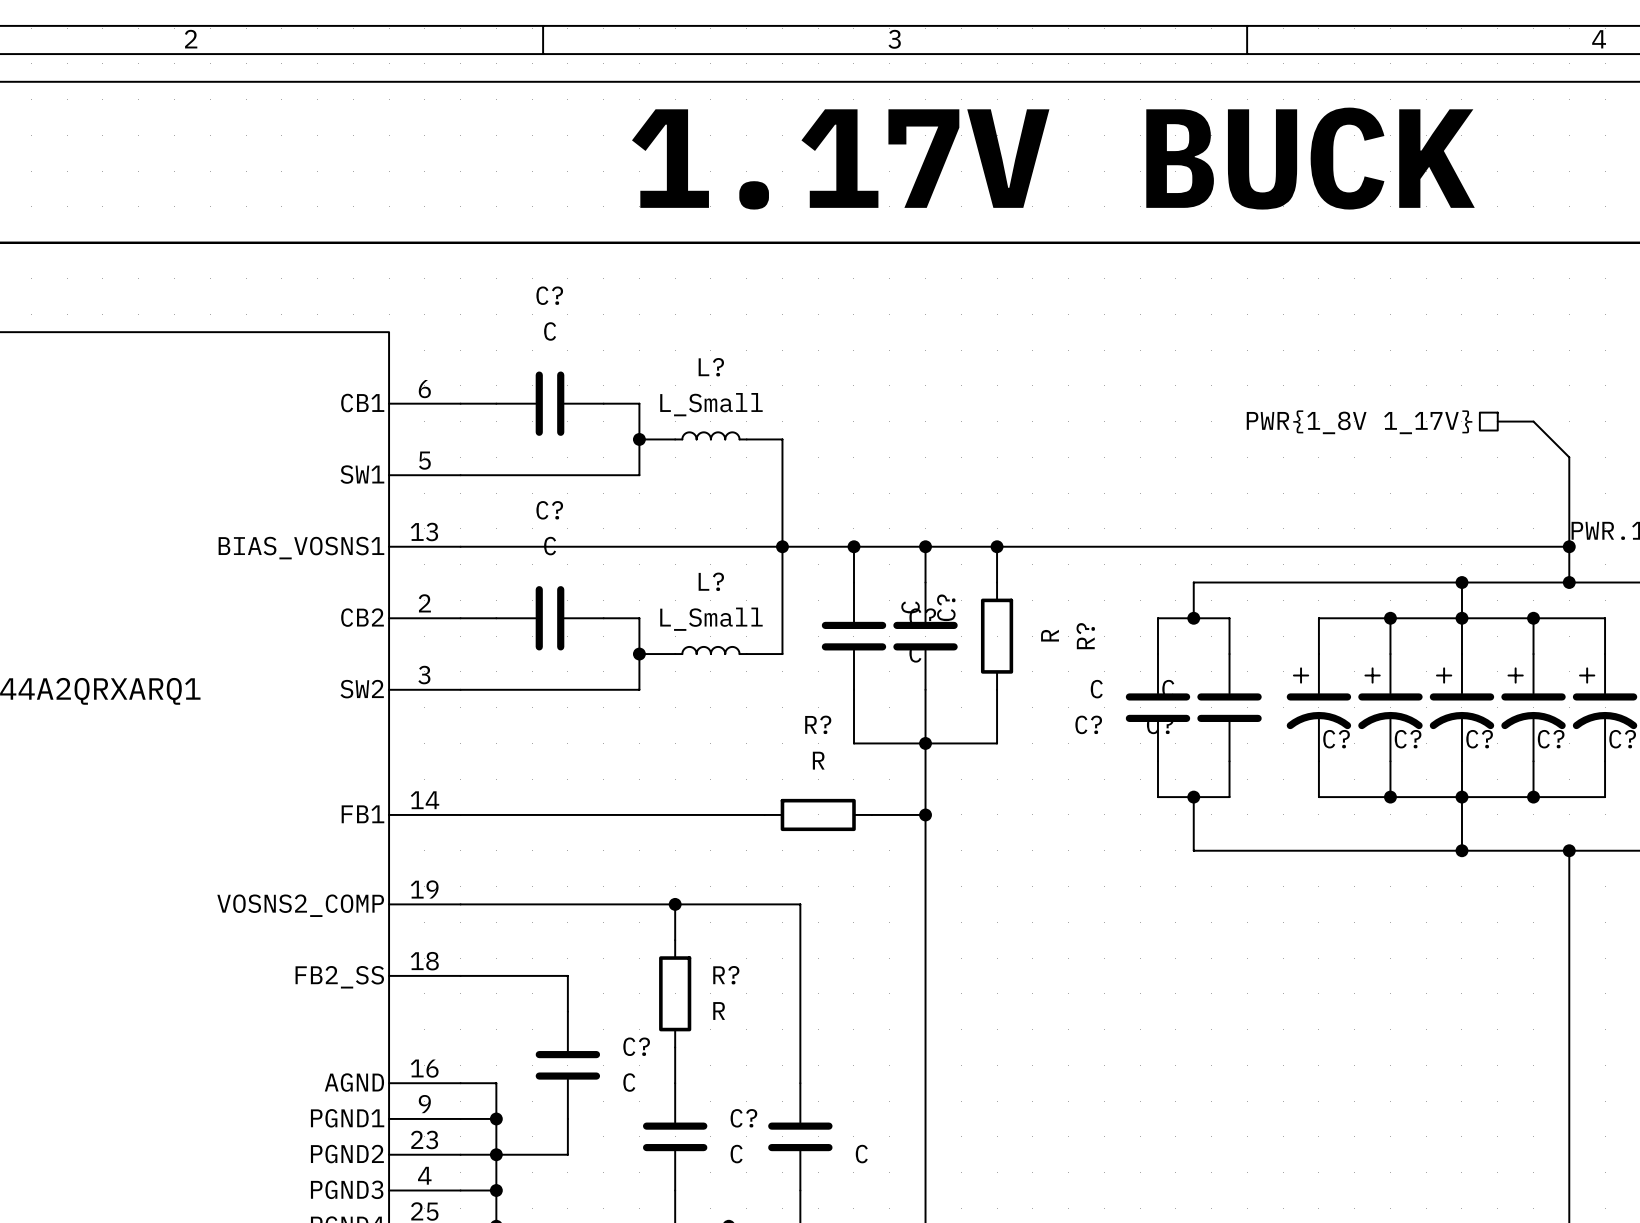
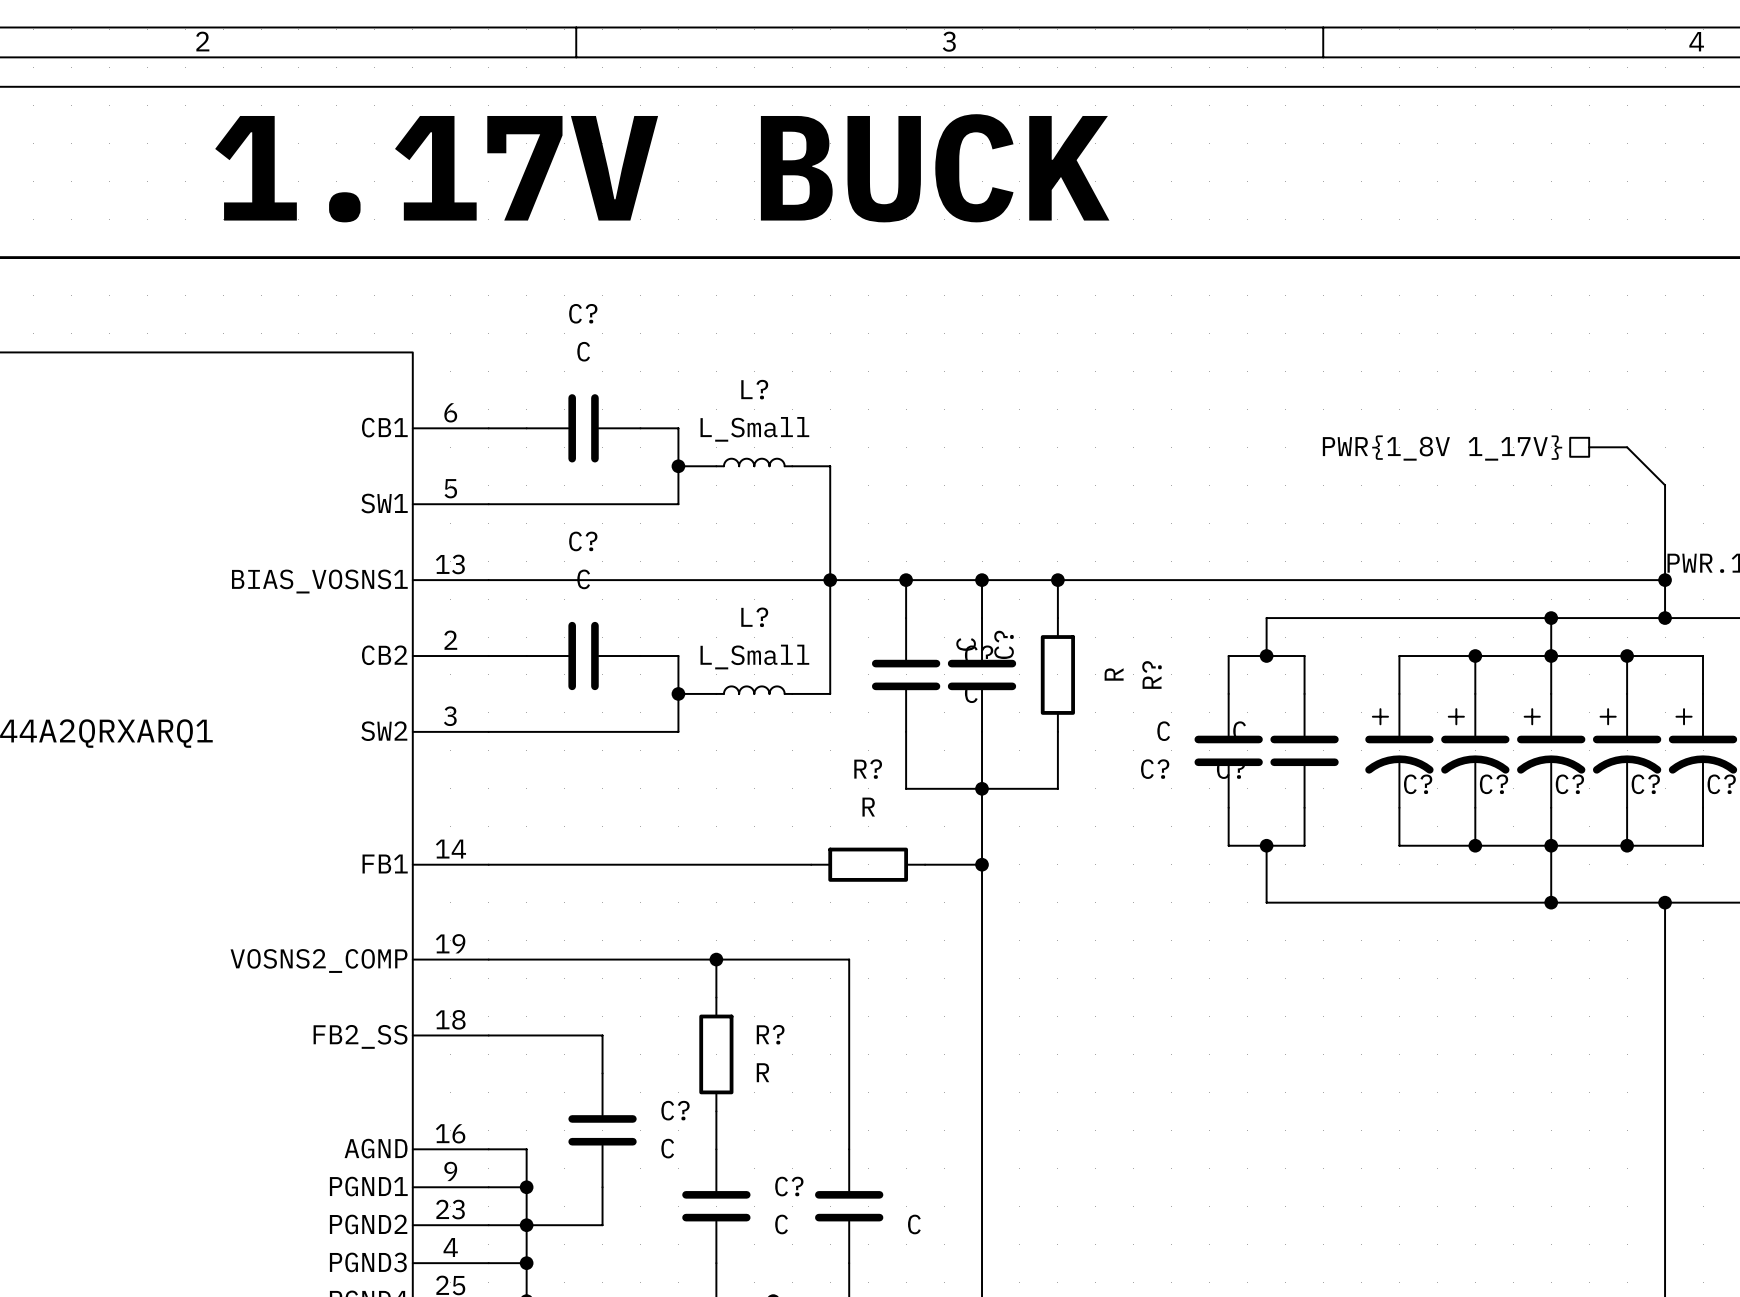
text: none -> 1.17V BUCK (662, 168)
text: 1.17V BUCK (1053, 158) -> none

